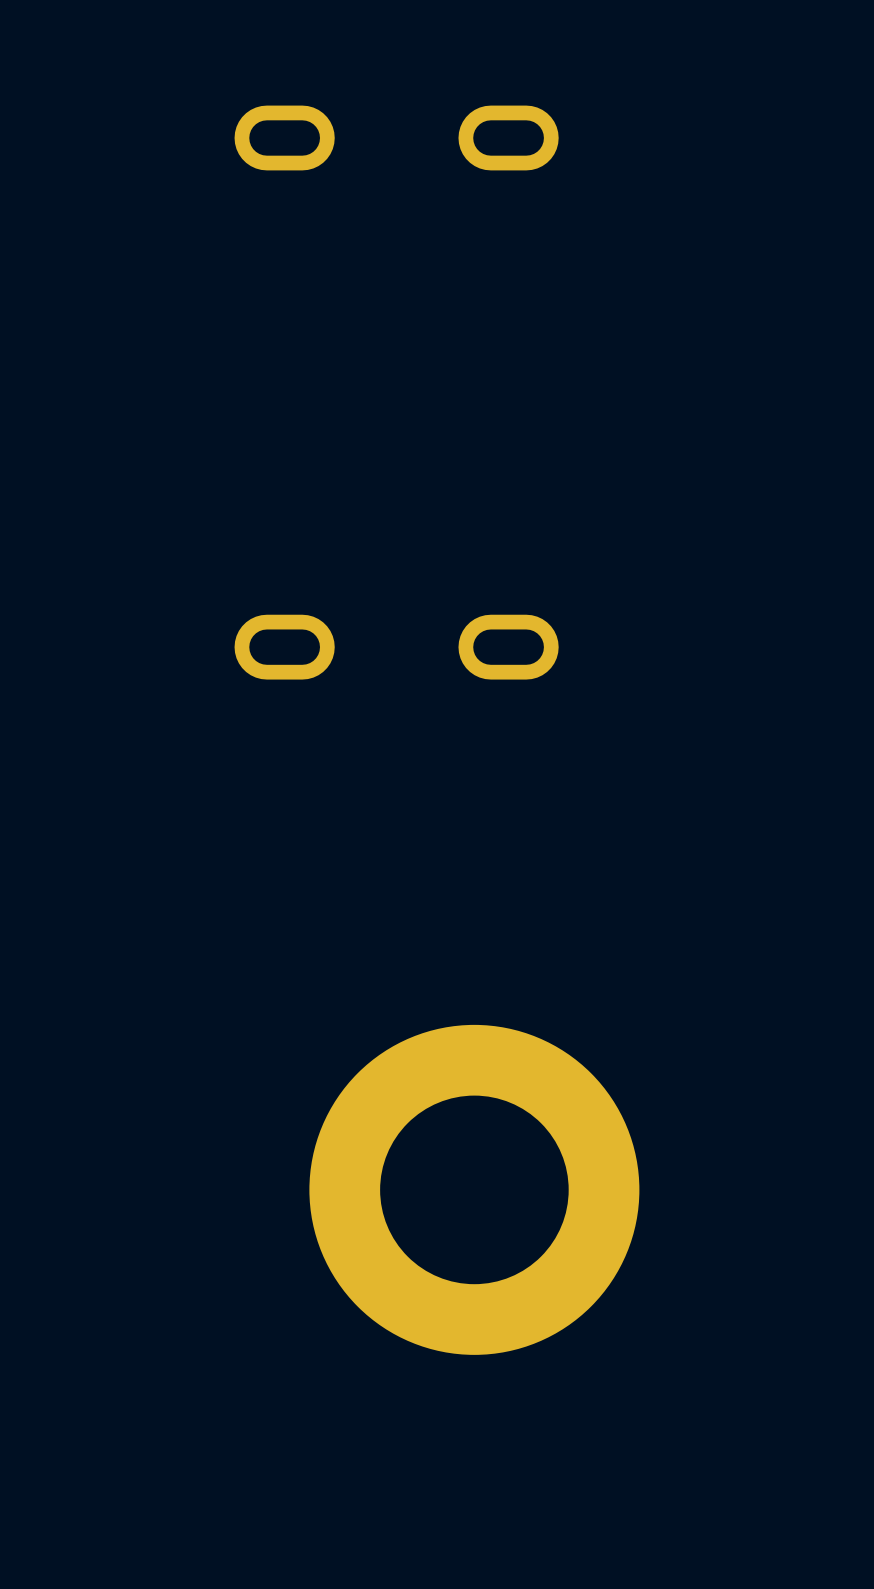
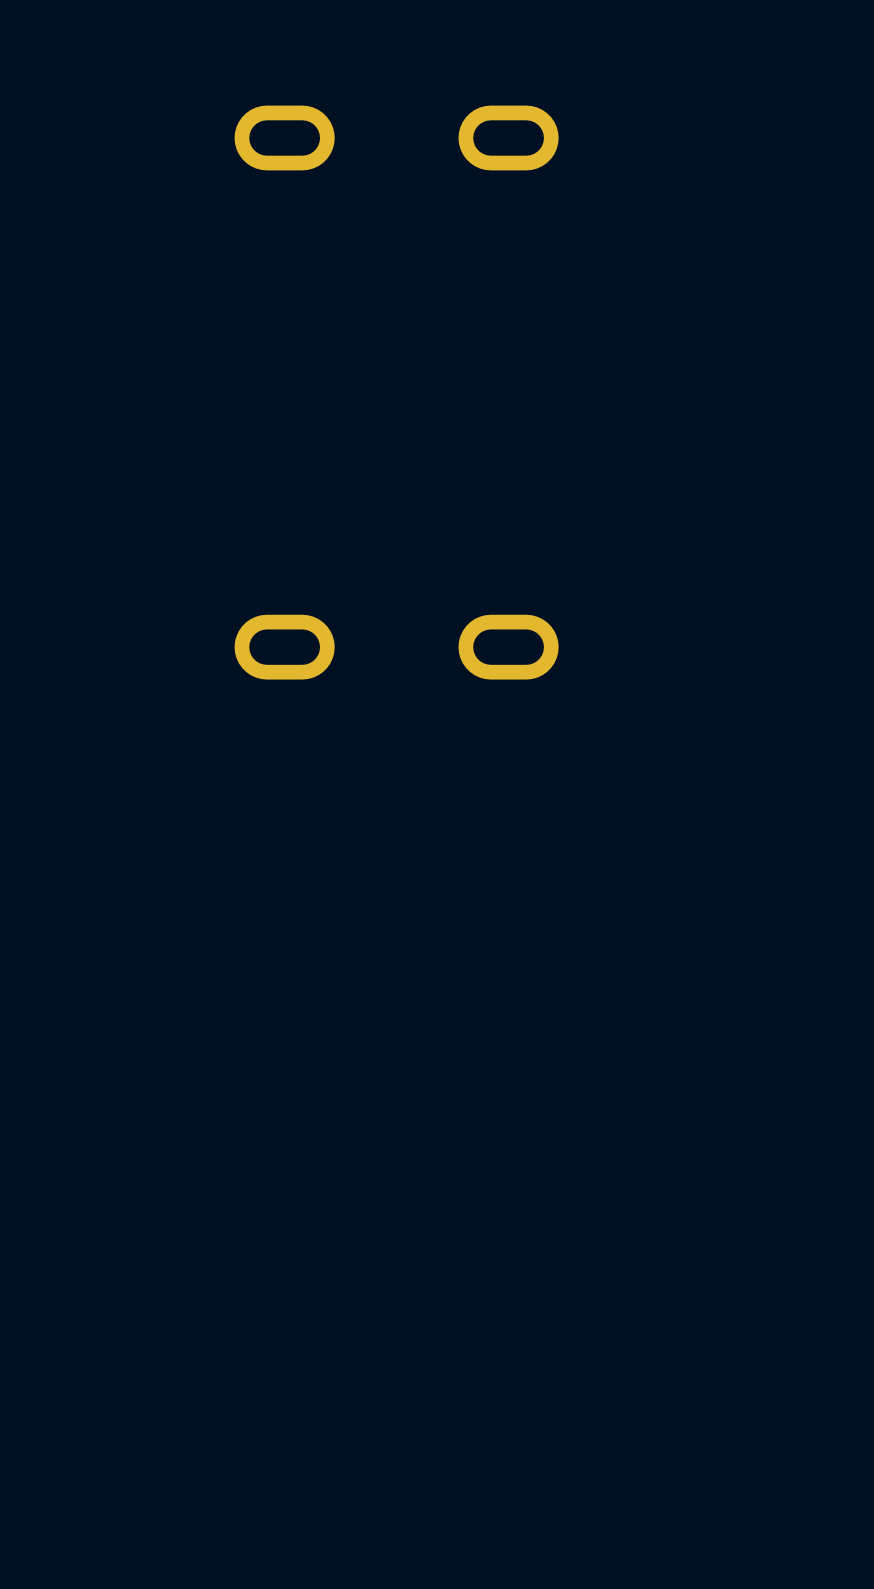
part: (474, 1189) -> none

